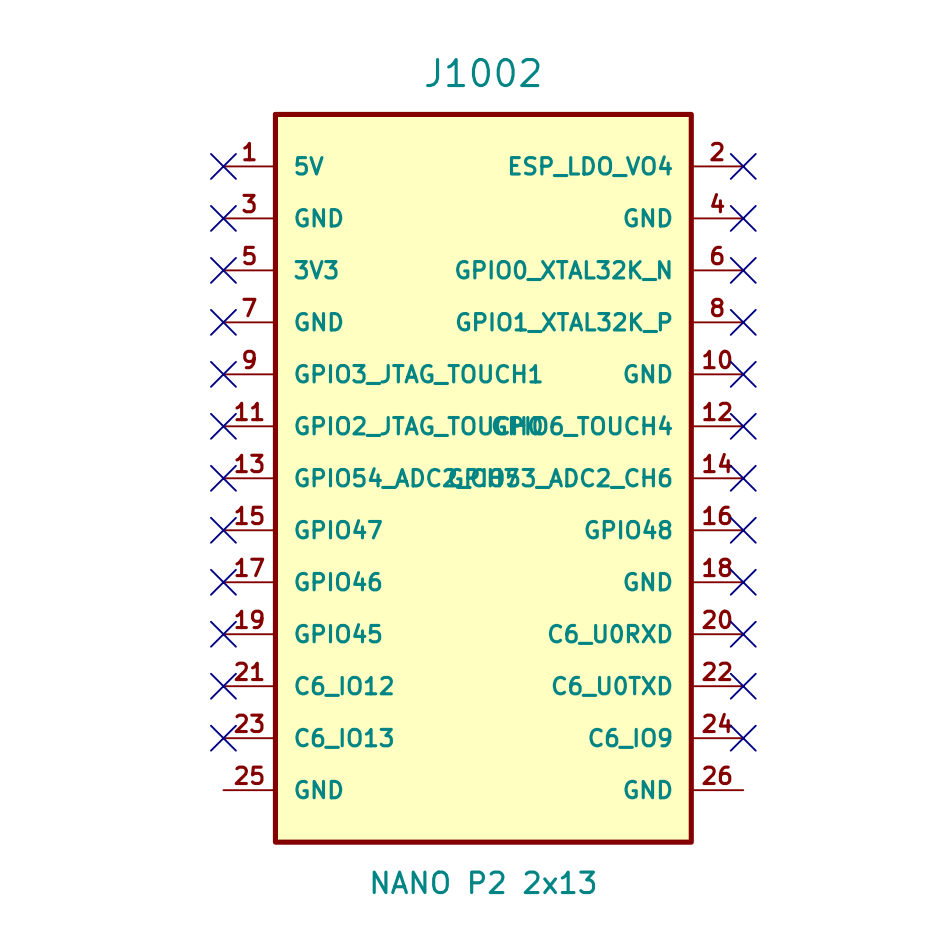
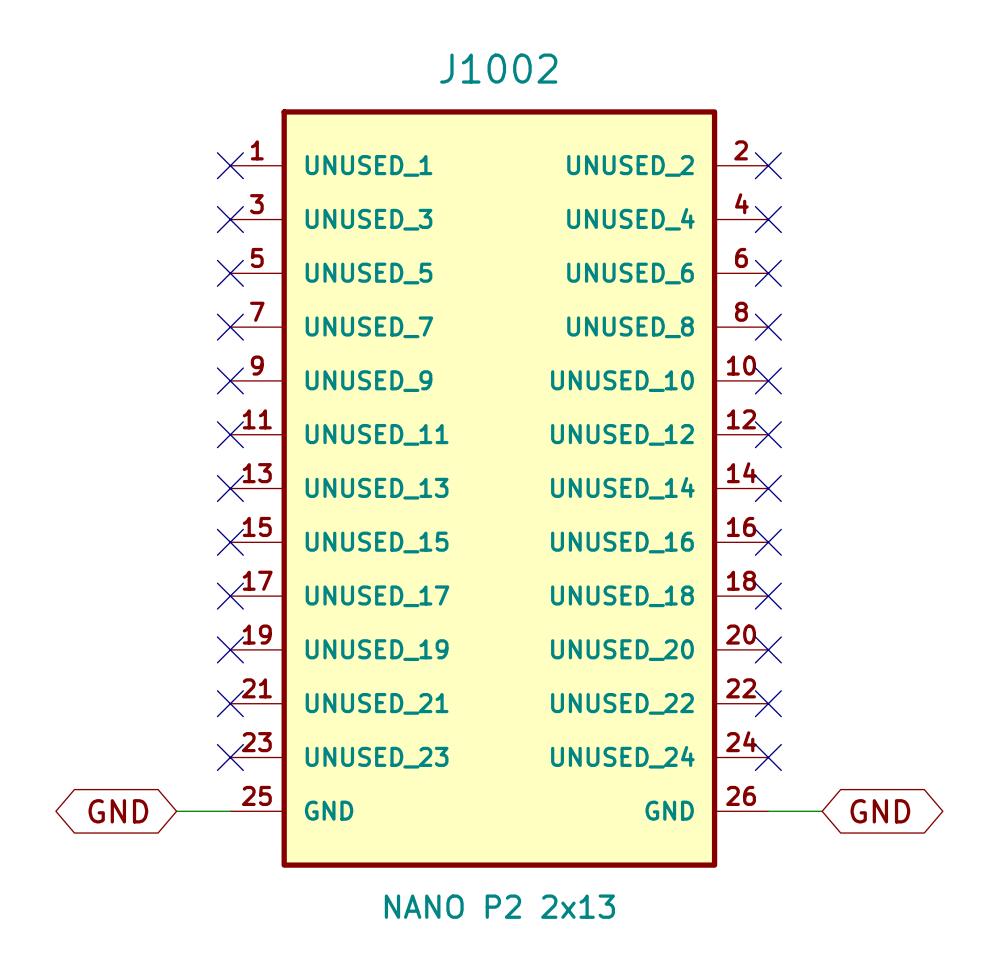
J1002 symbol: [223, 111, 744, 845] -> [230, 109, 769, 868]
global label: none -> GND (118, 811)
wire: none -> (176, 811) (230, 811)
wire: none -> (768, 811) (822, 811)
global label: none -> GND (880, 811)

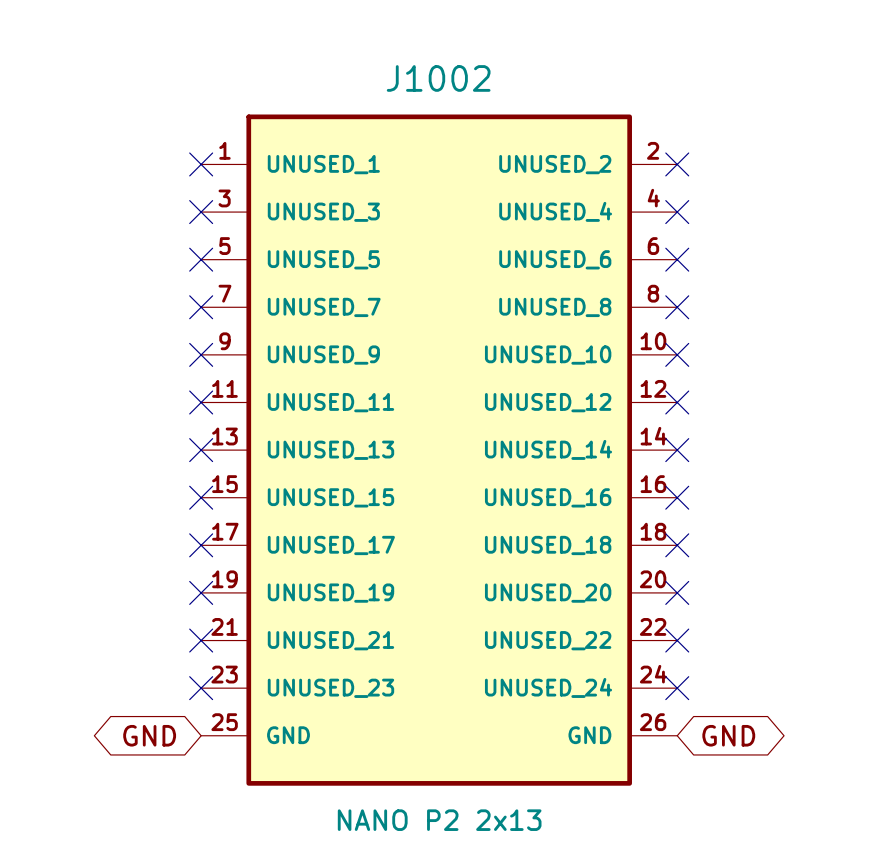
global label position: GND (118, 811) -> GND (149, 735)
wire: (176, 811) (230, 811) -> none
wire: (768, 811) (822, 811) -> none
global label position: GND (880, 811) -> GND (728, 735)

